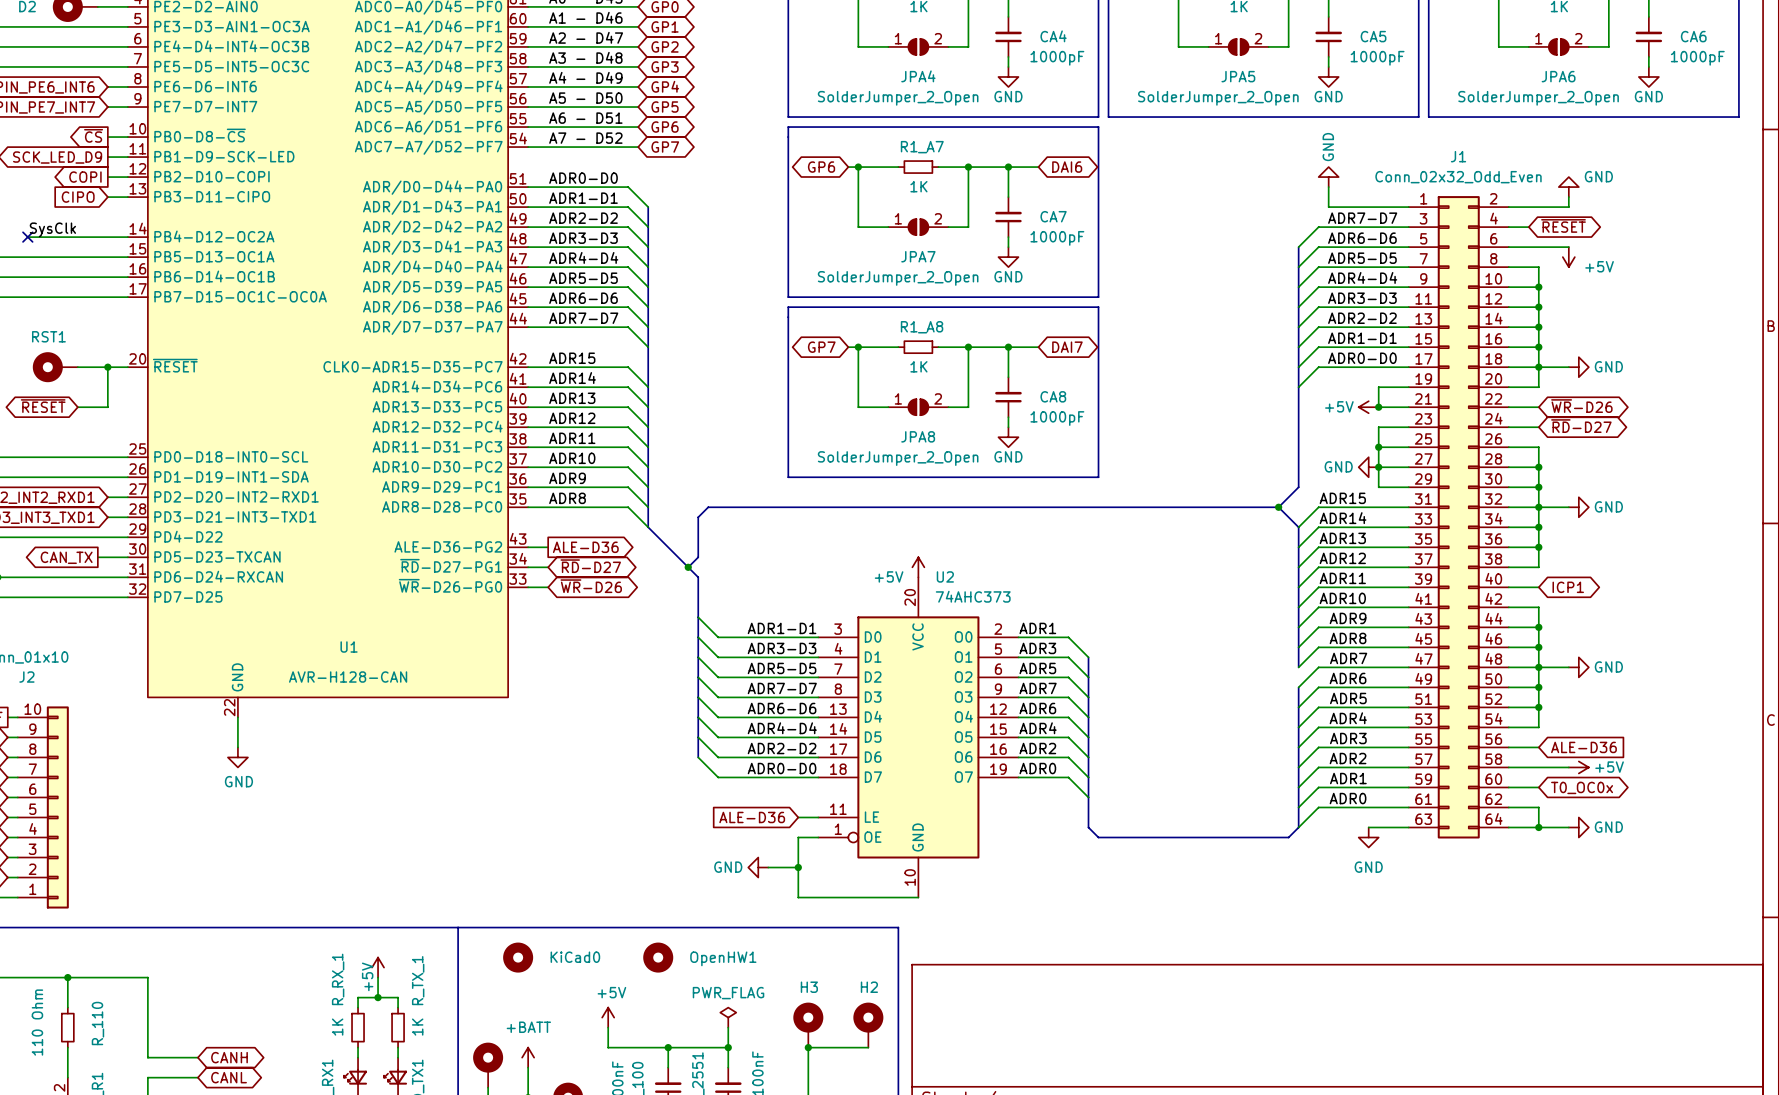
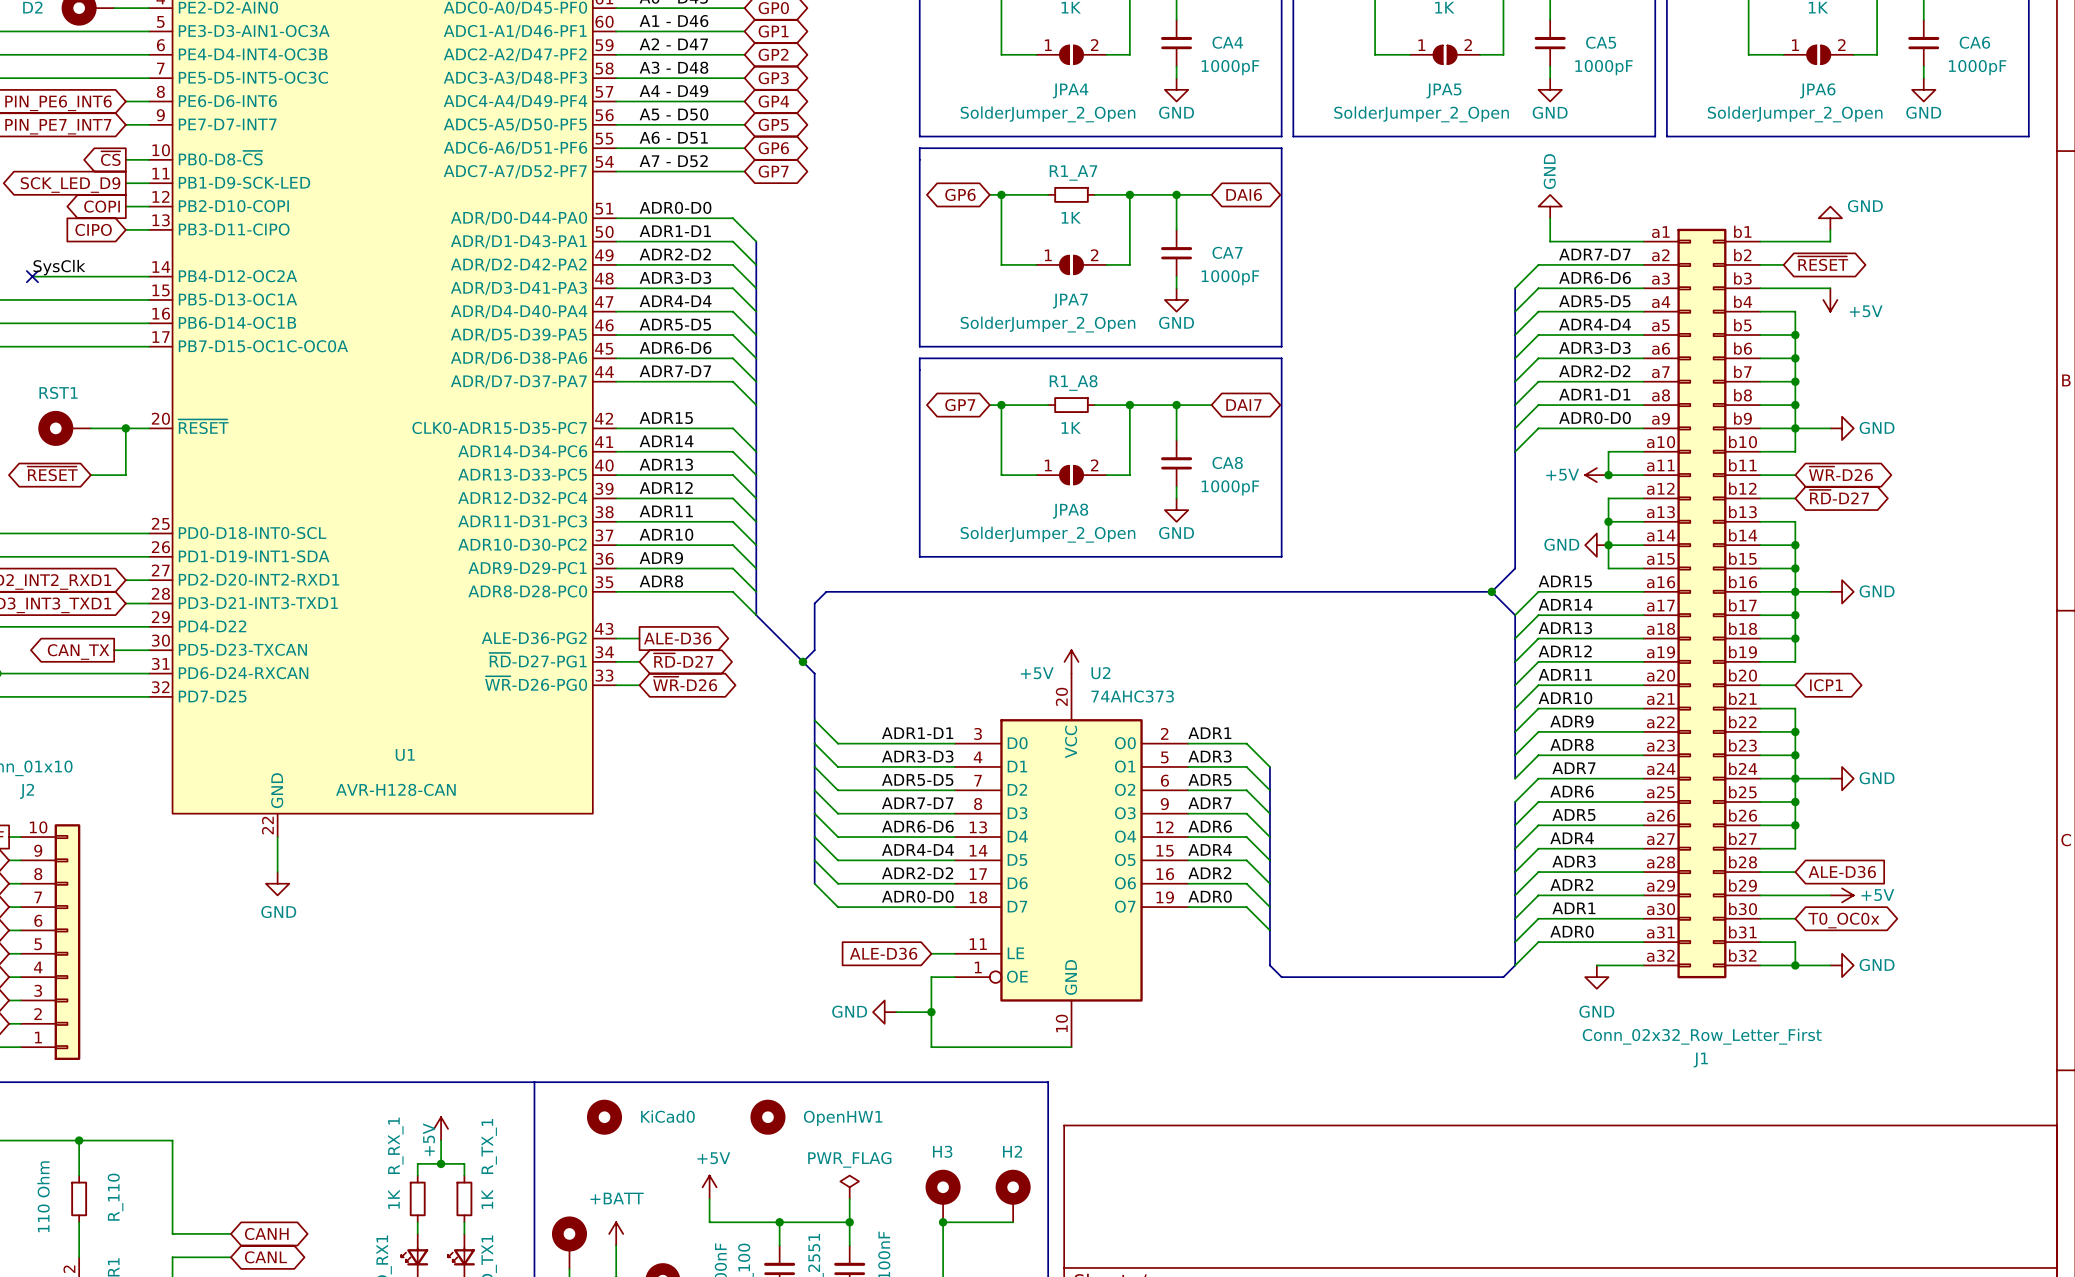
J1 name position: J1 (1458, 156) -> J1 (1700, 1060)
J1 value: Conn_02x32_Odd_Even (1458, 177) -> Conn_02x32_Row_Letter_First (1702, 1036)
J1 symbol: [1408, 196, 1509, 839] -> [1643, 228, 1761, 979]

